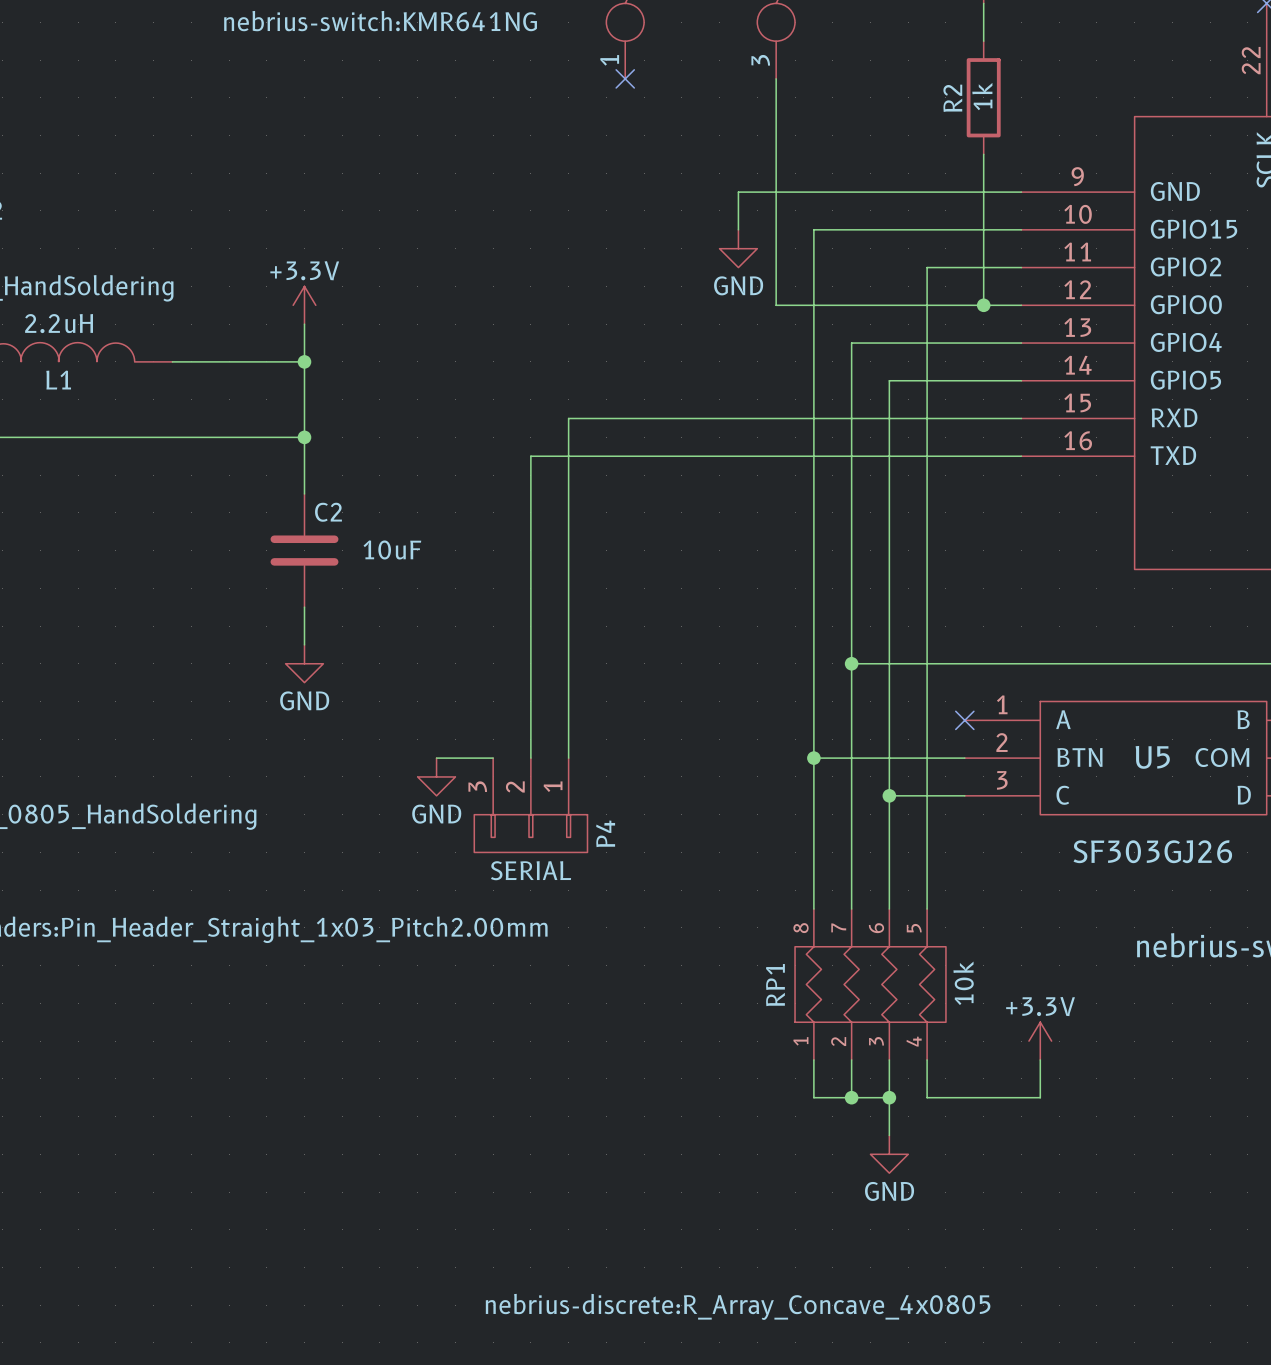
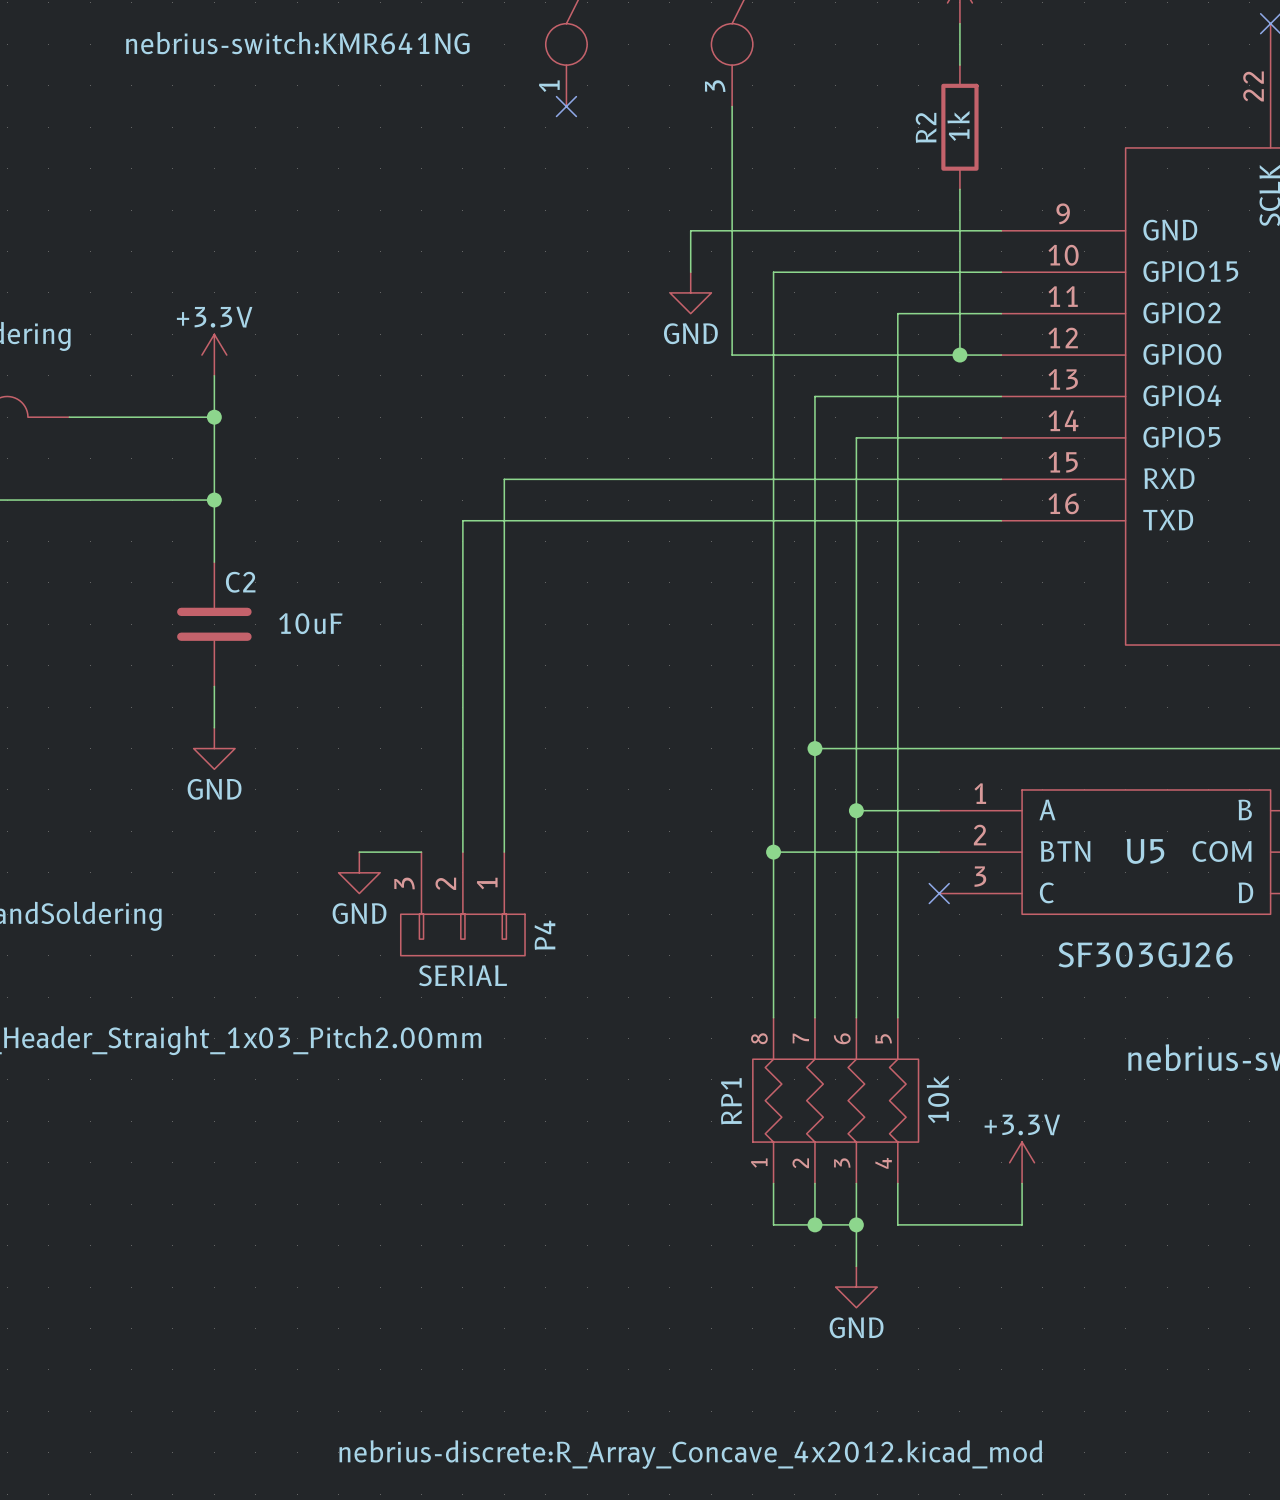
no-connect mark position: (964, 720) -> (939, 893)
wire: (889, 795) (964, 795) -> (856, 810) (939, 810)
junction position: (889, 795) -> (856, 810)
RP1 text: nebrius-discrete:R_Array_Concave_4x0805 (738, 1306) -> nebrius-discrete:R_Array_Concave_4x2012.kicad_mod (690, 1454)

